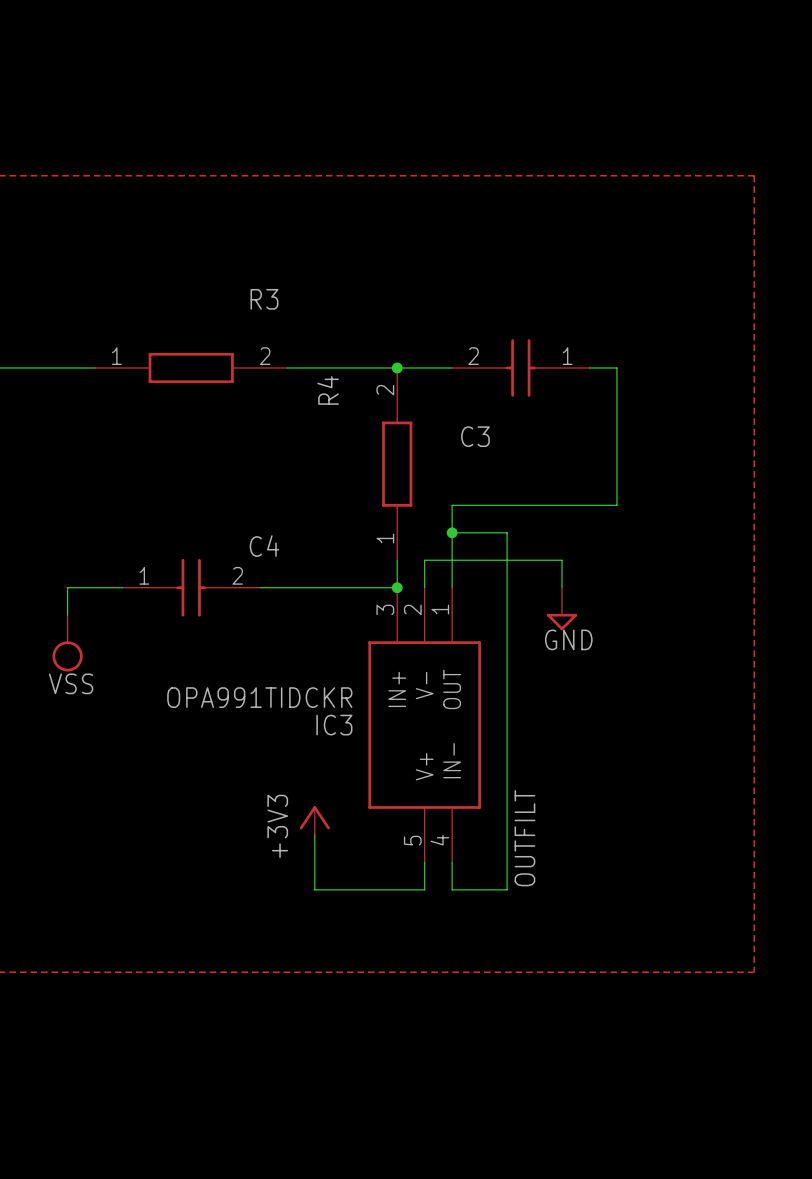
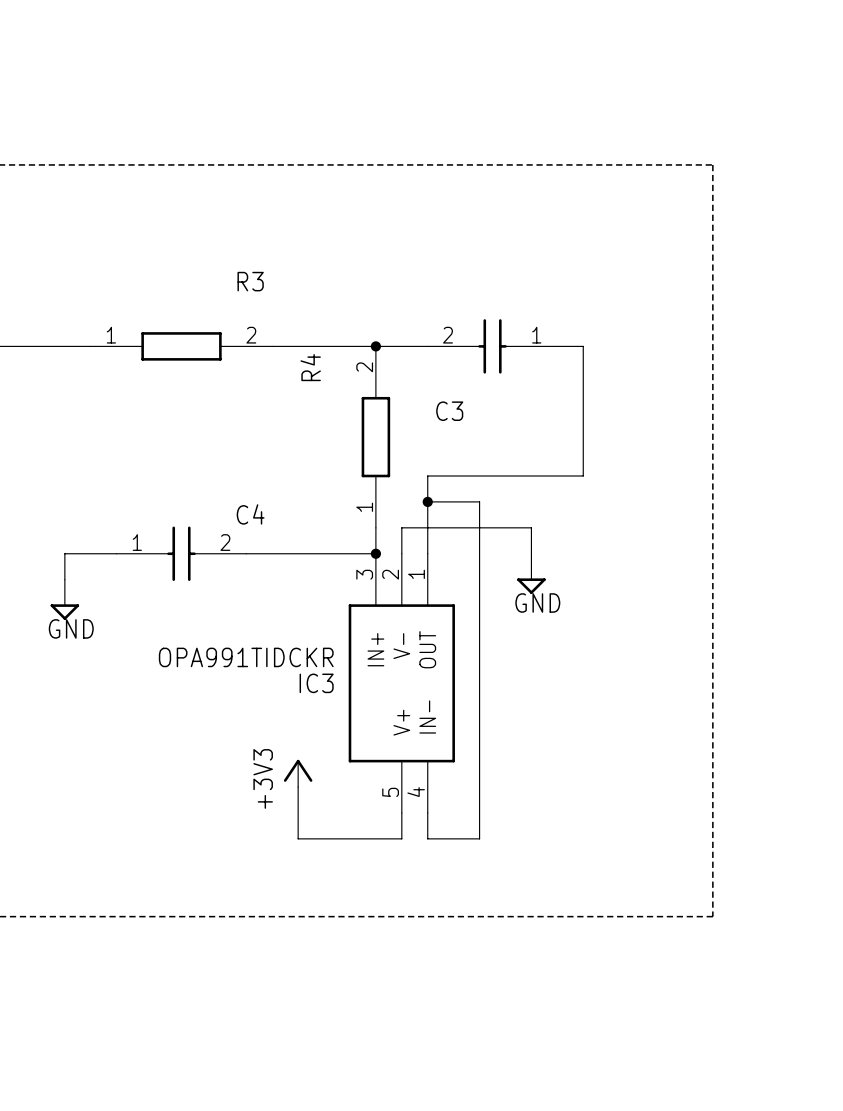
power symbol: VSS (67, 643) -> GND (64, 599)
label: OUTFILT (524, 838) -> none

